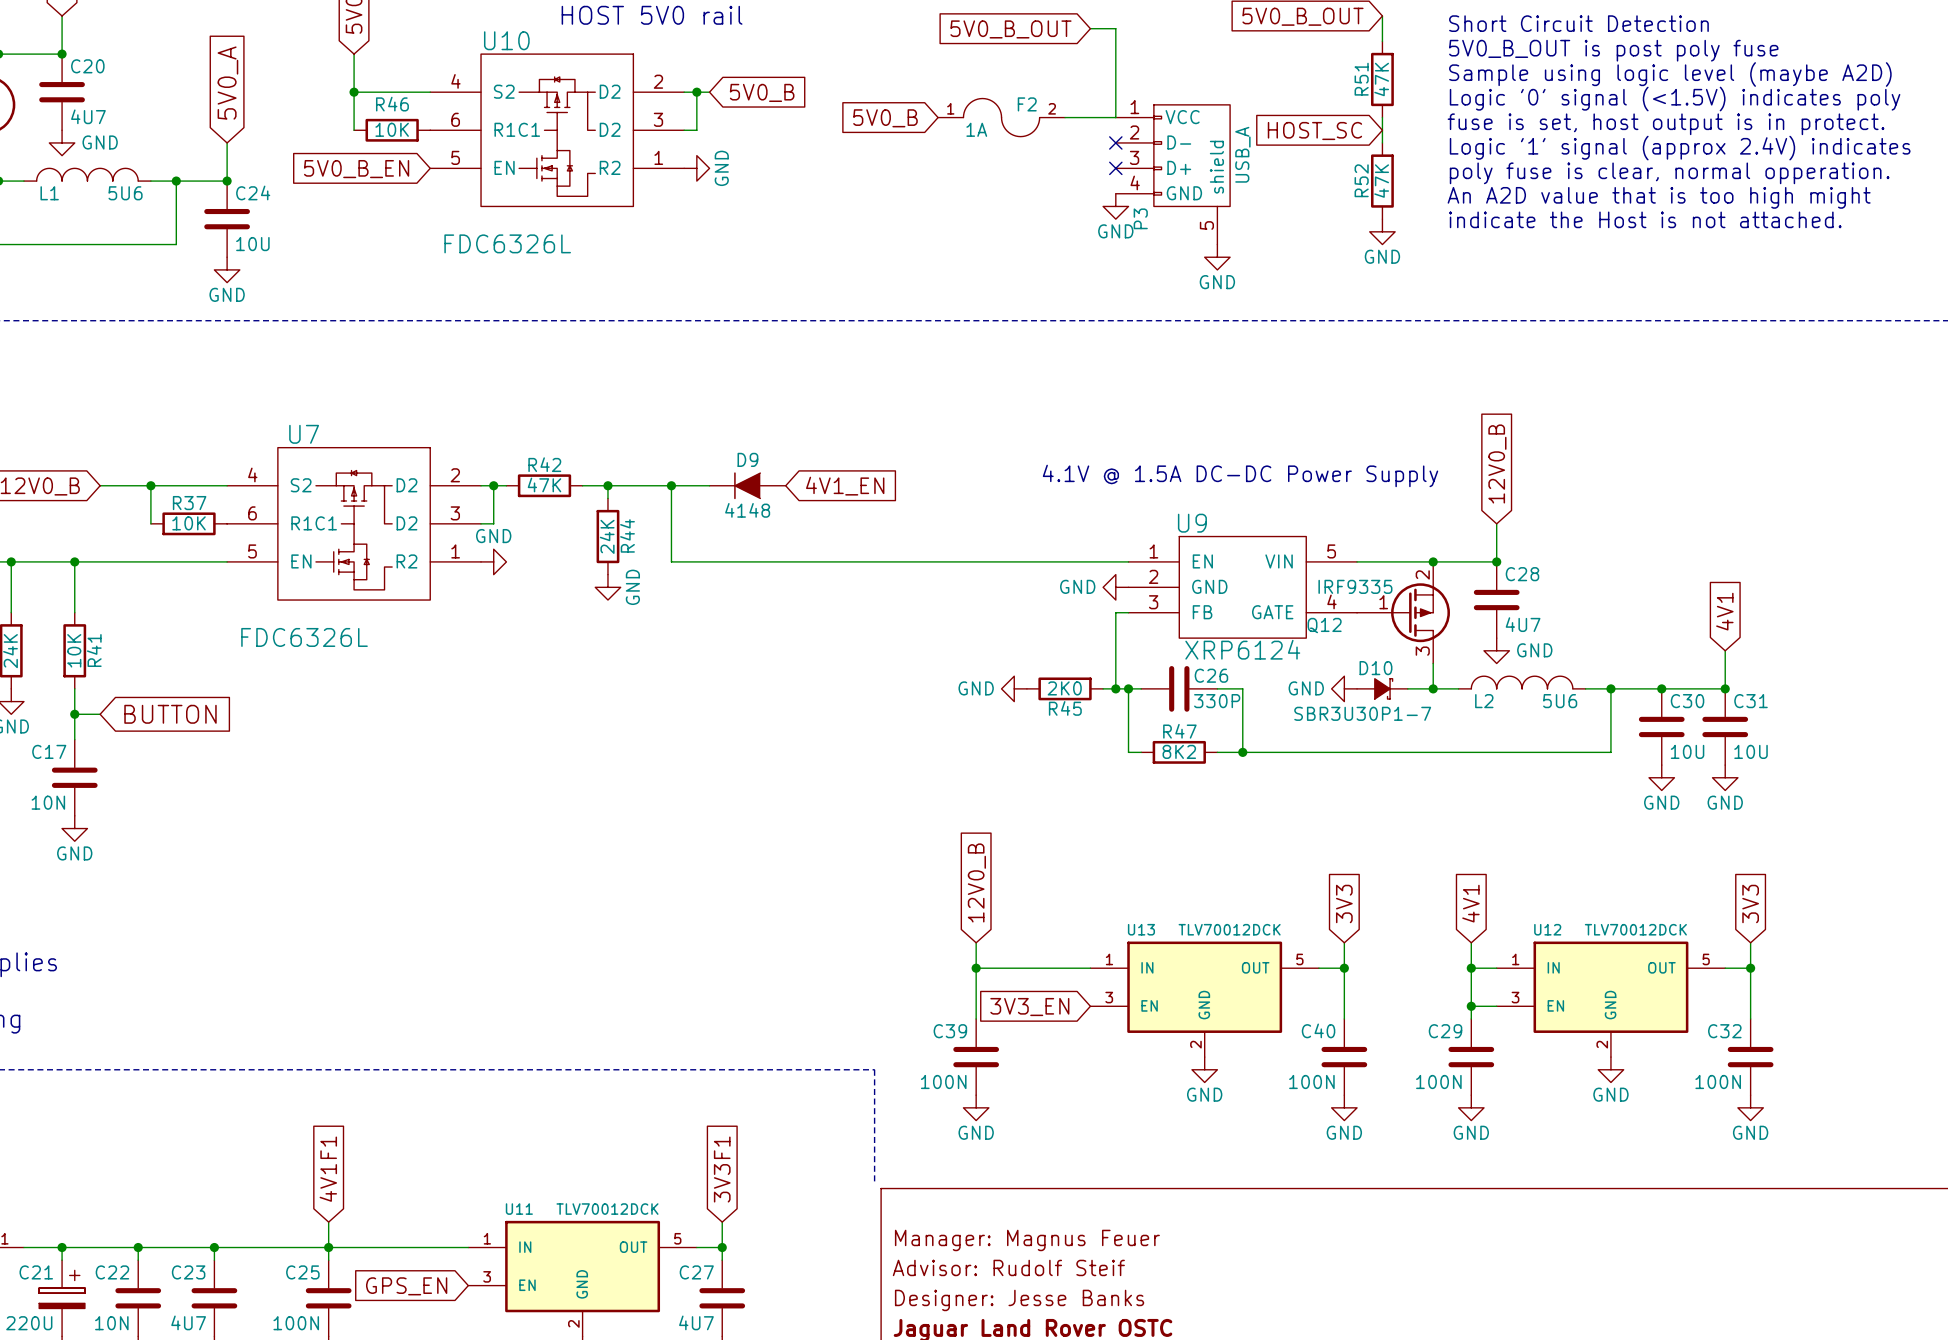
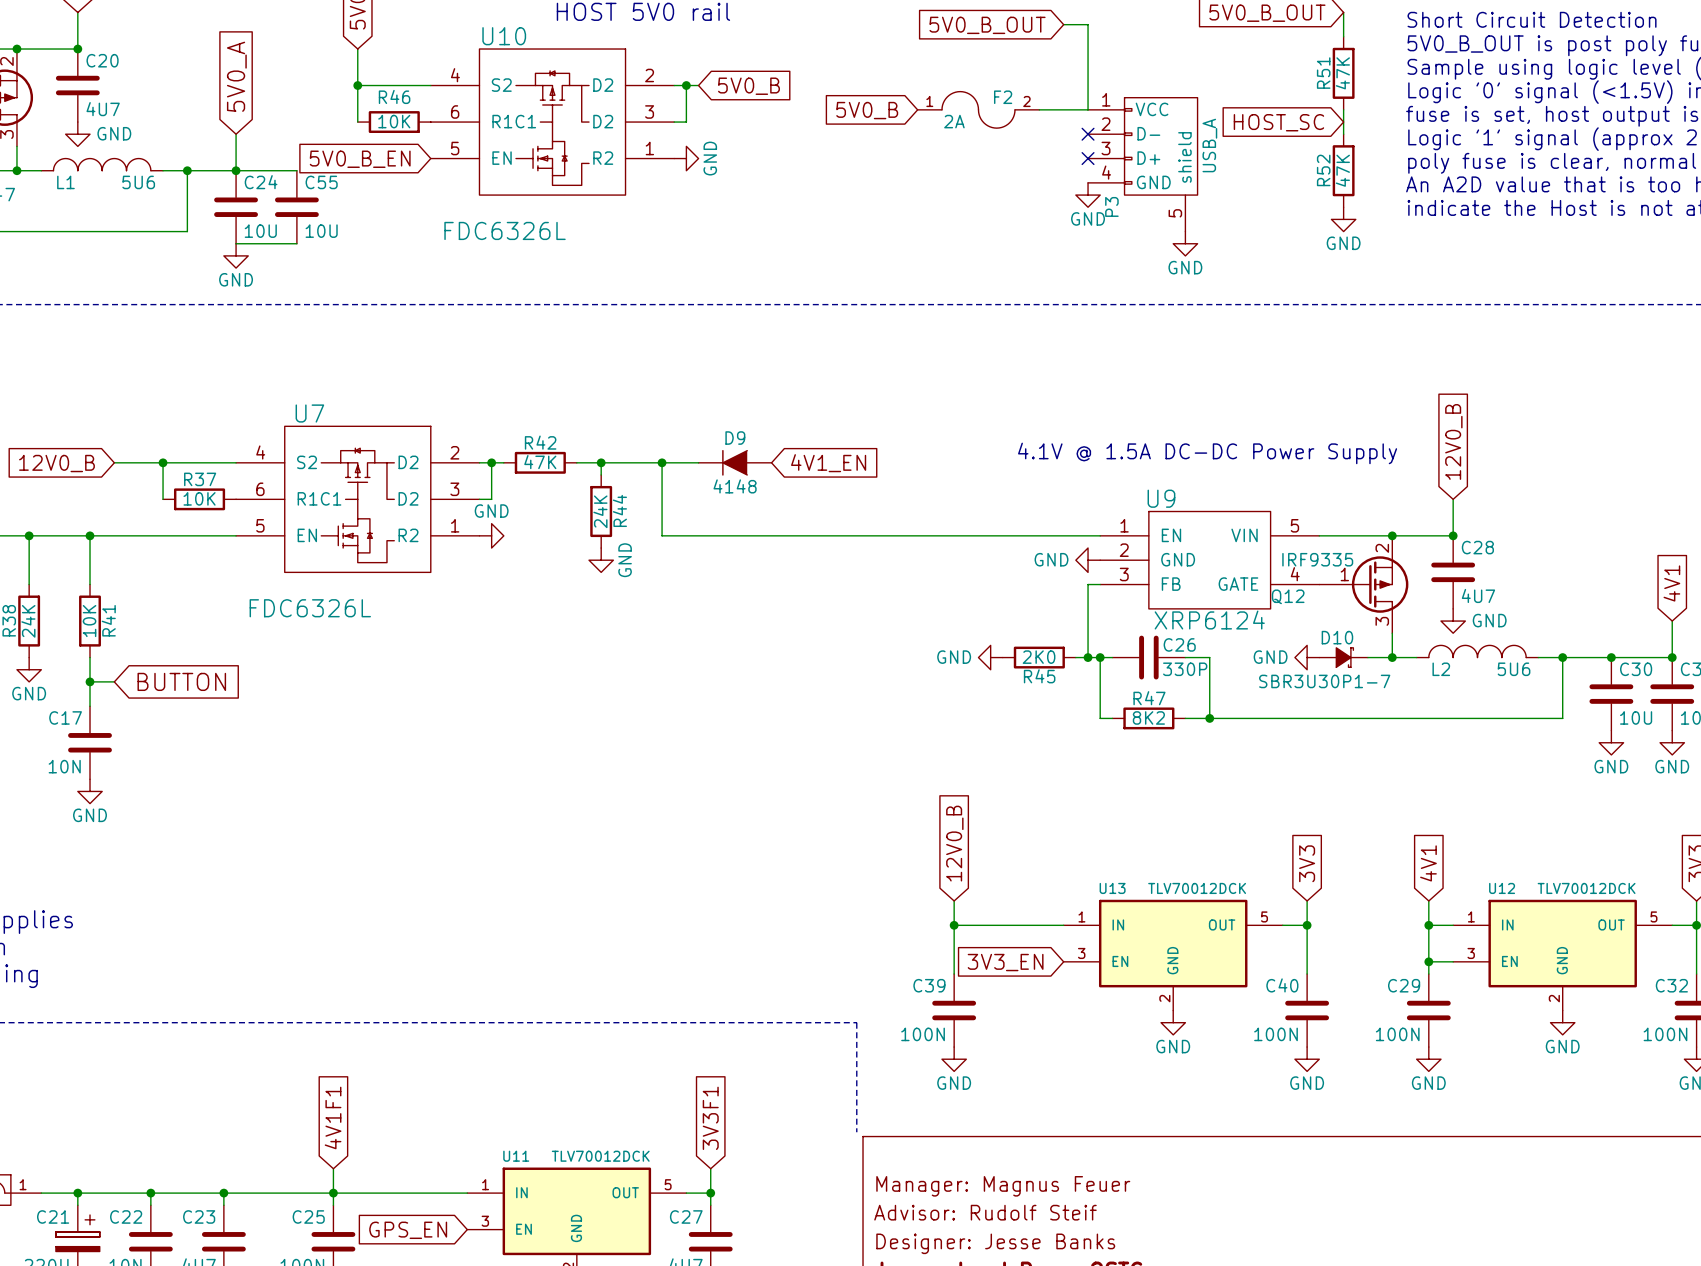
F2 value: 1A (976, 129) -> 2A (954, 121)
wire: none -> (236, 170) (296, 170)
C55: none -> 10U (296, 207)
wire: none -> (236, 243) (296, 243)

